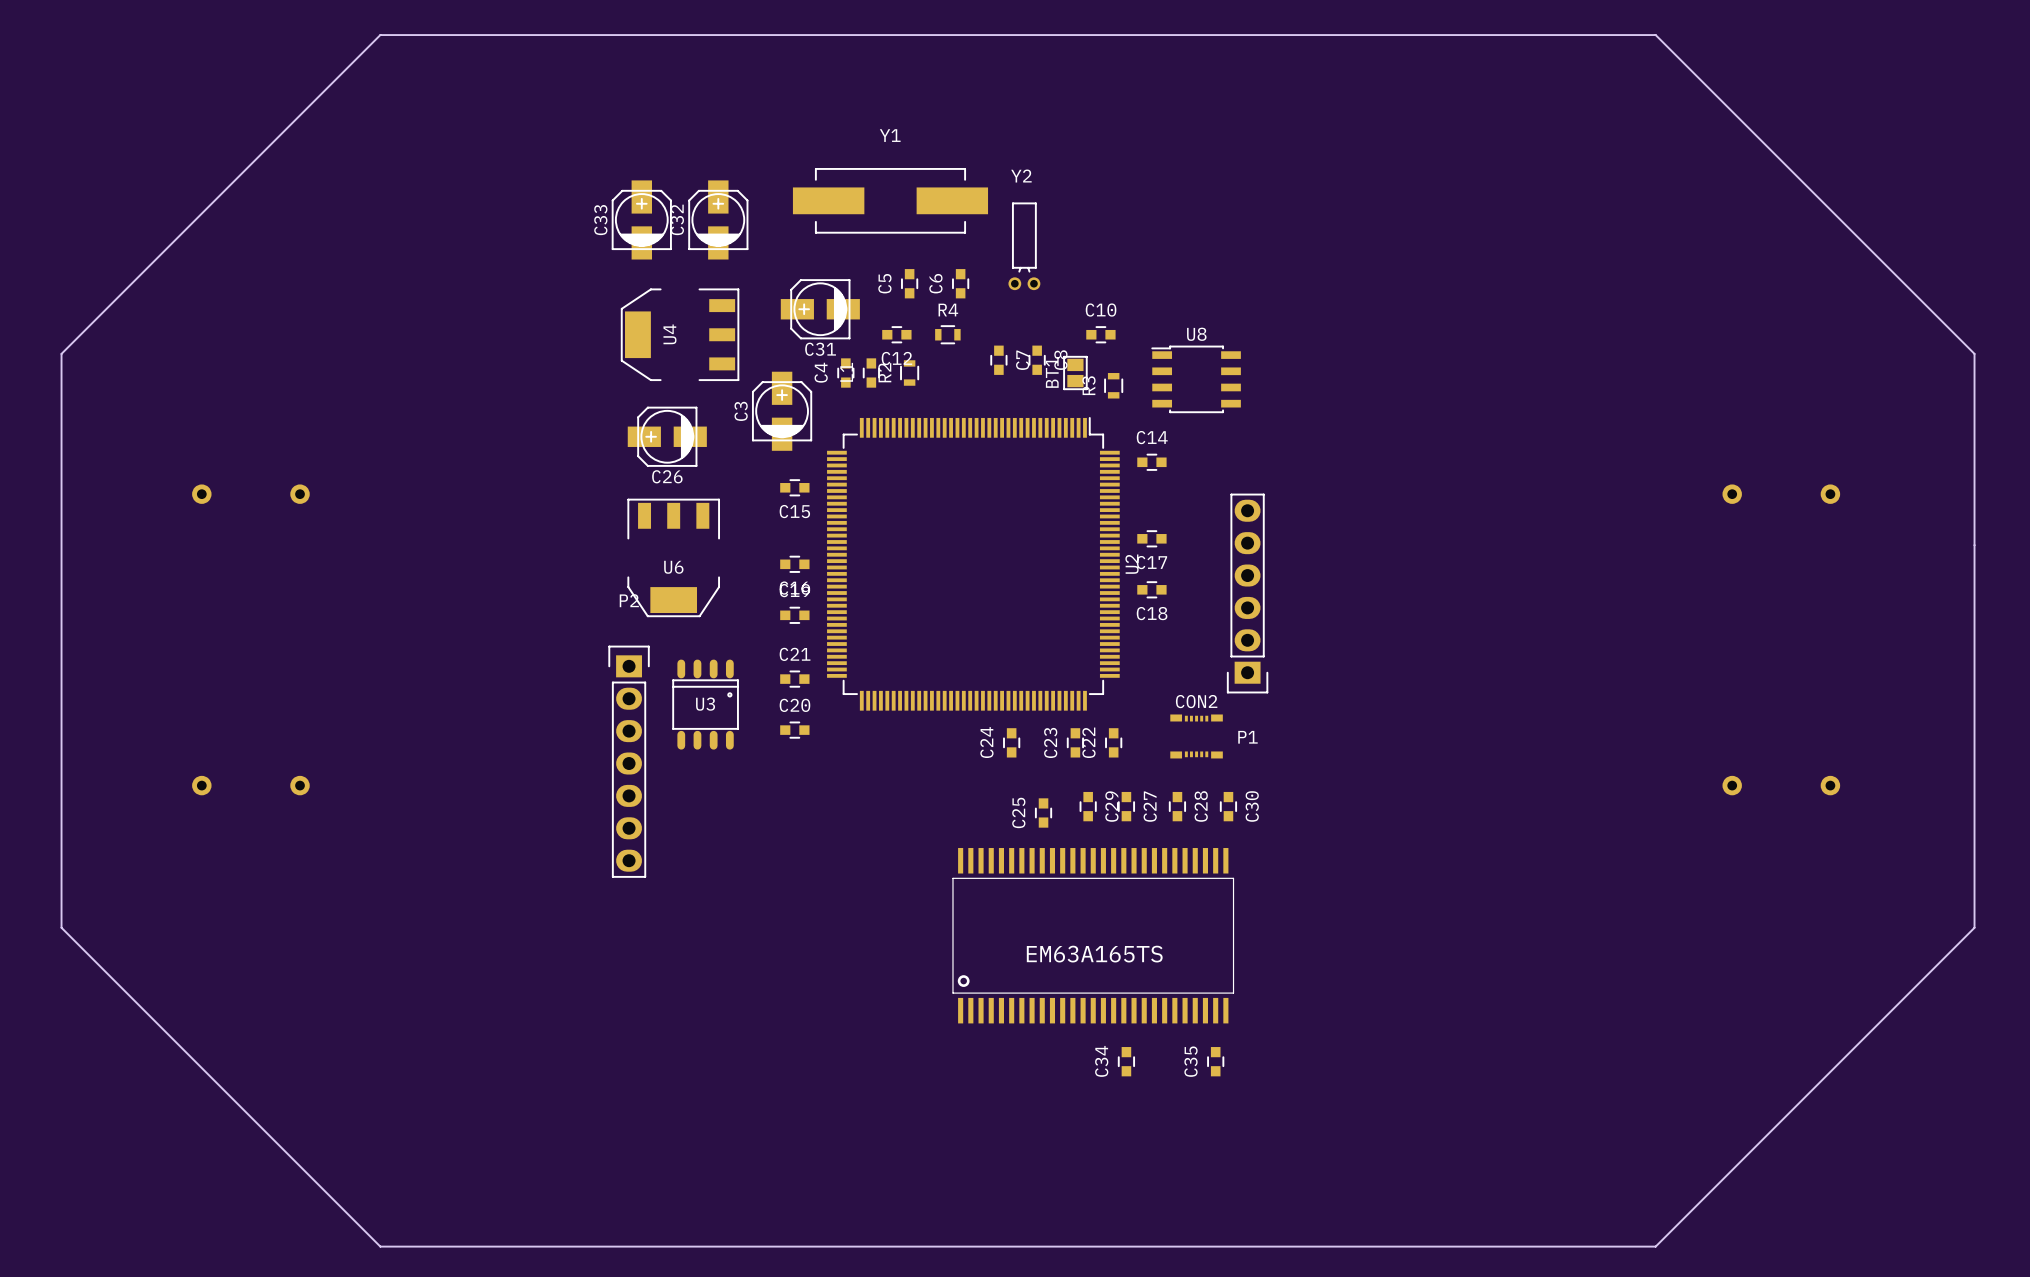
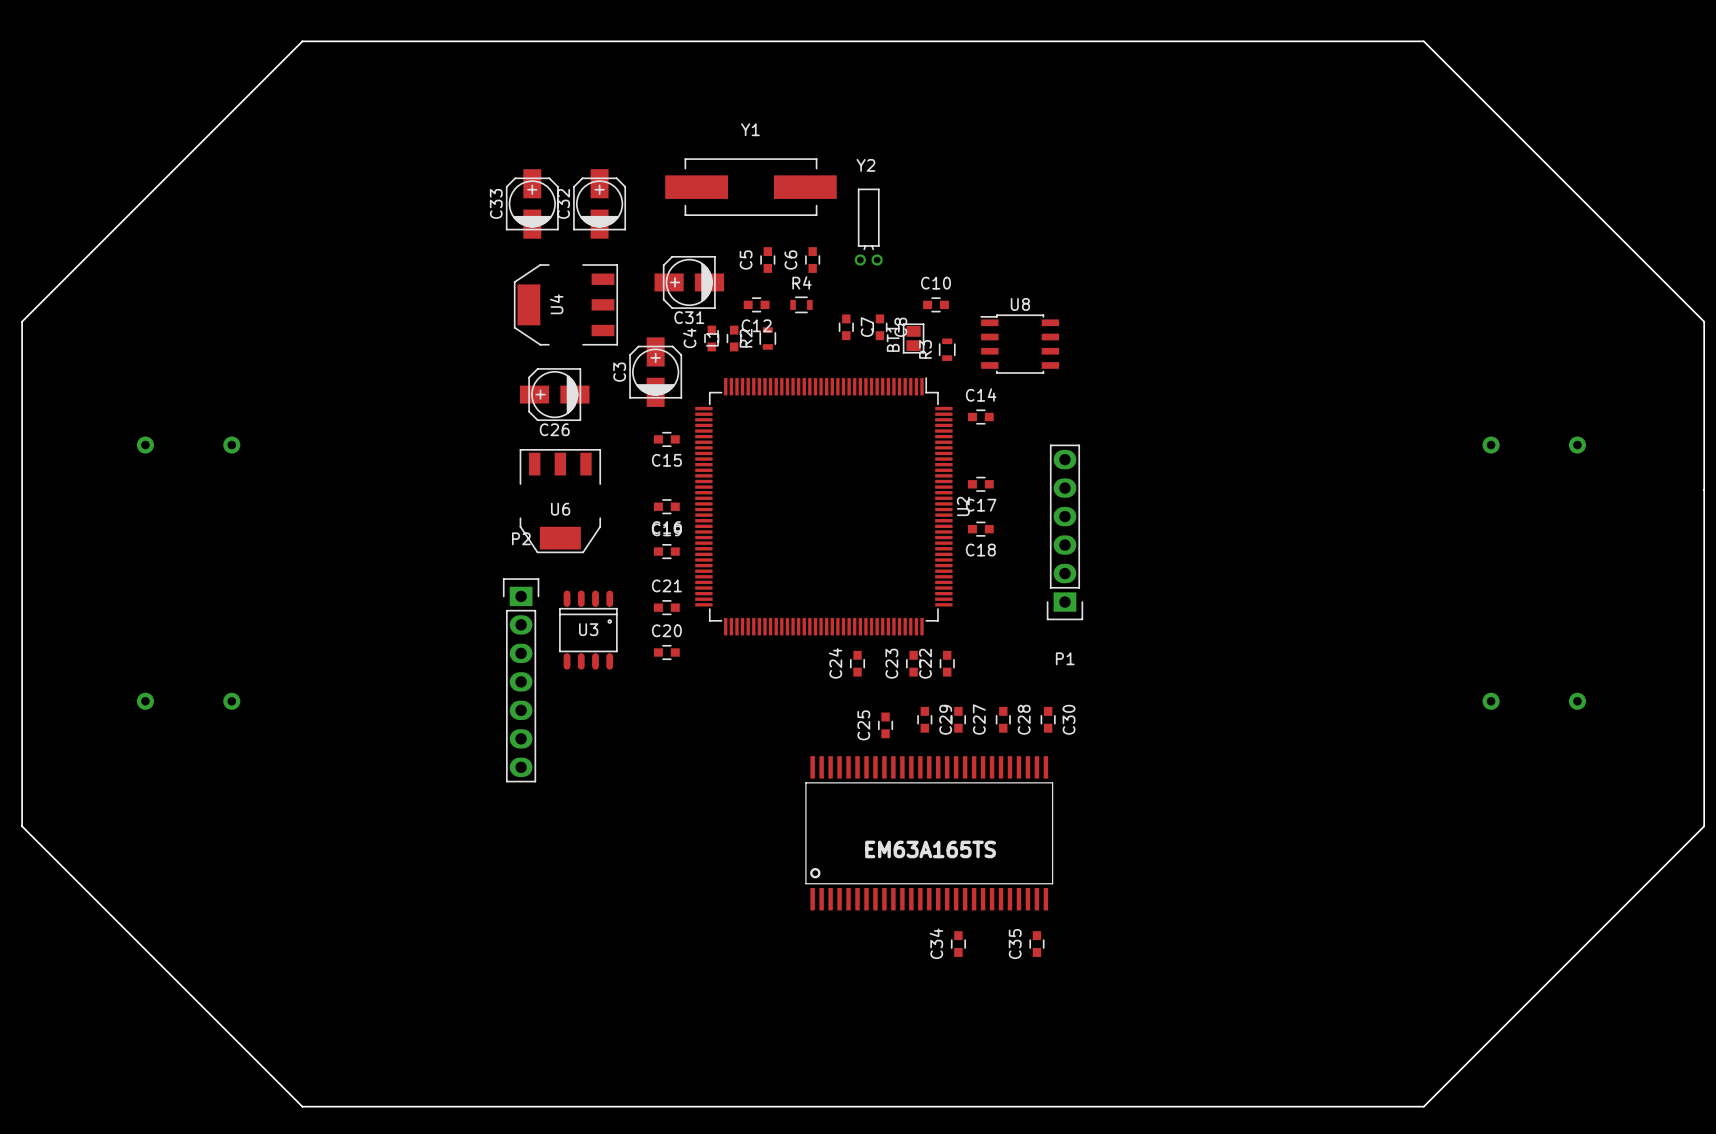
CON2: (1196, 736) -> none

